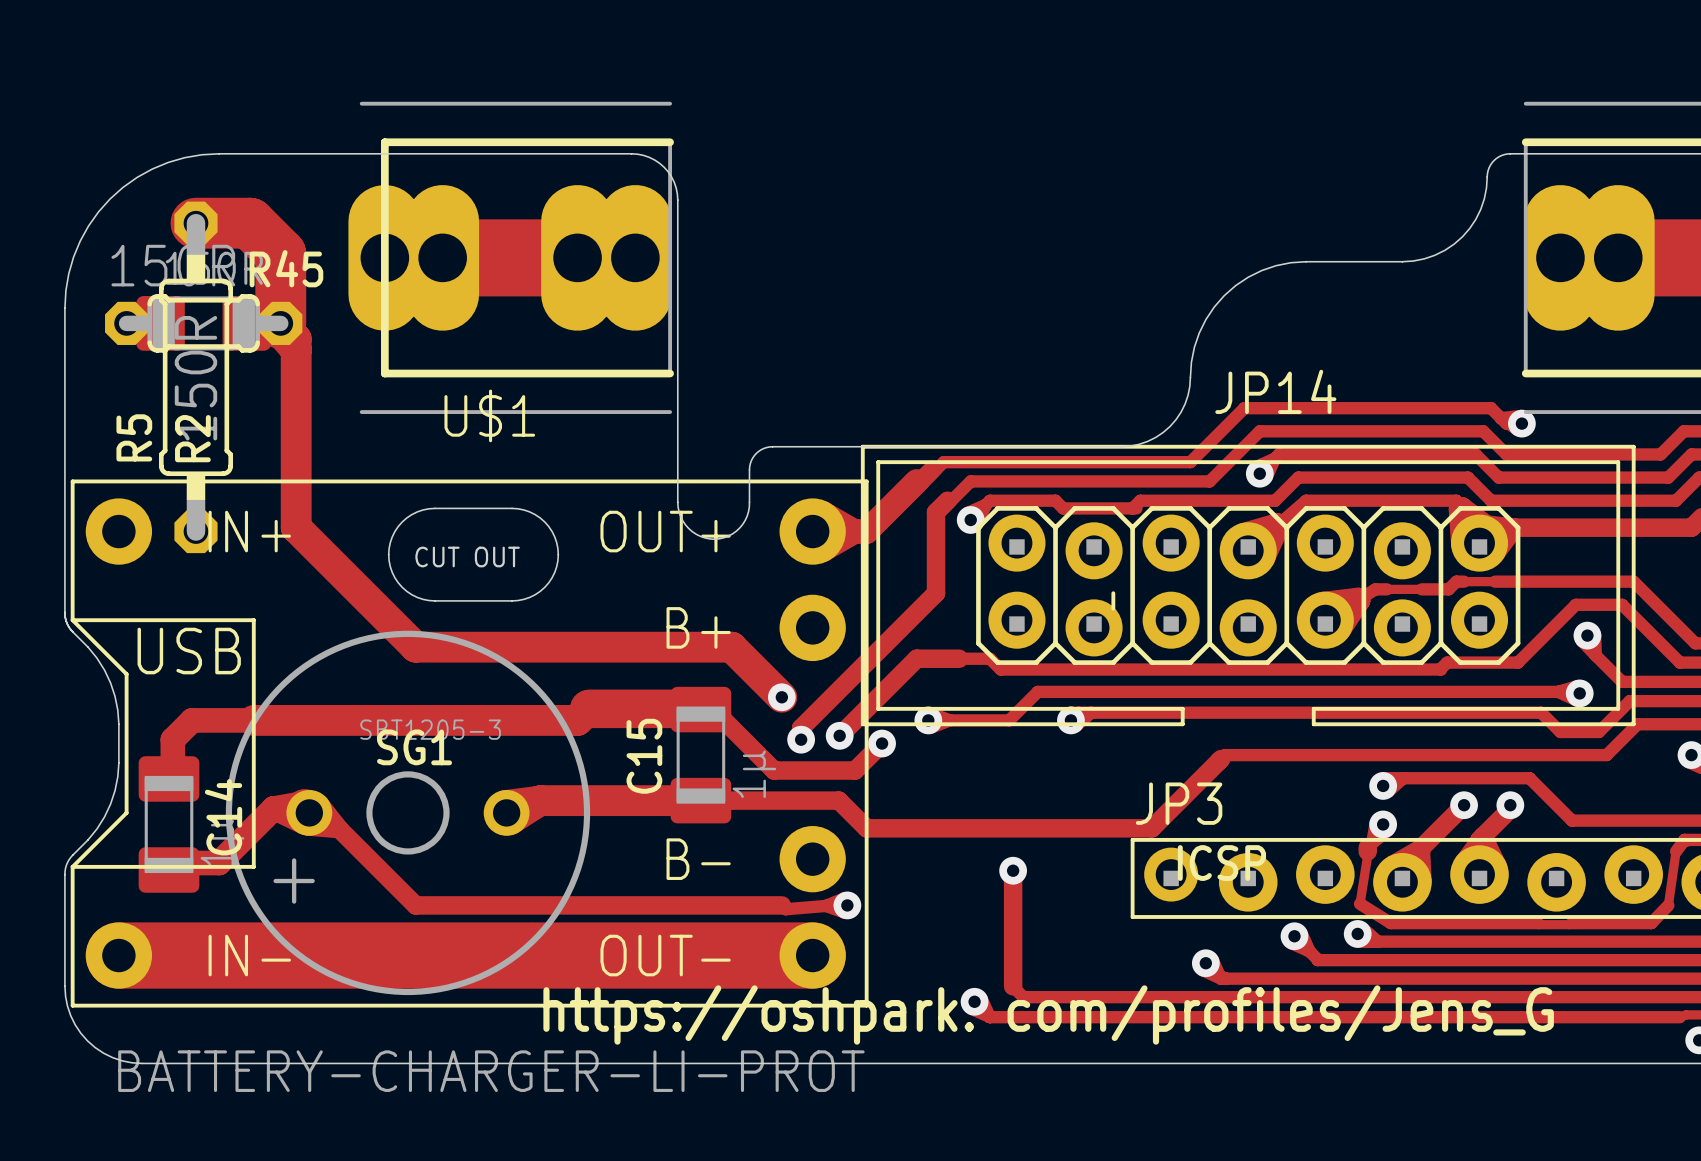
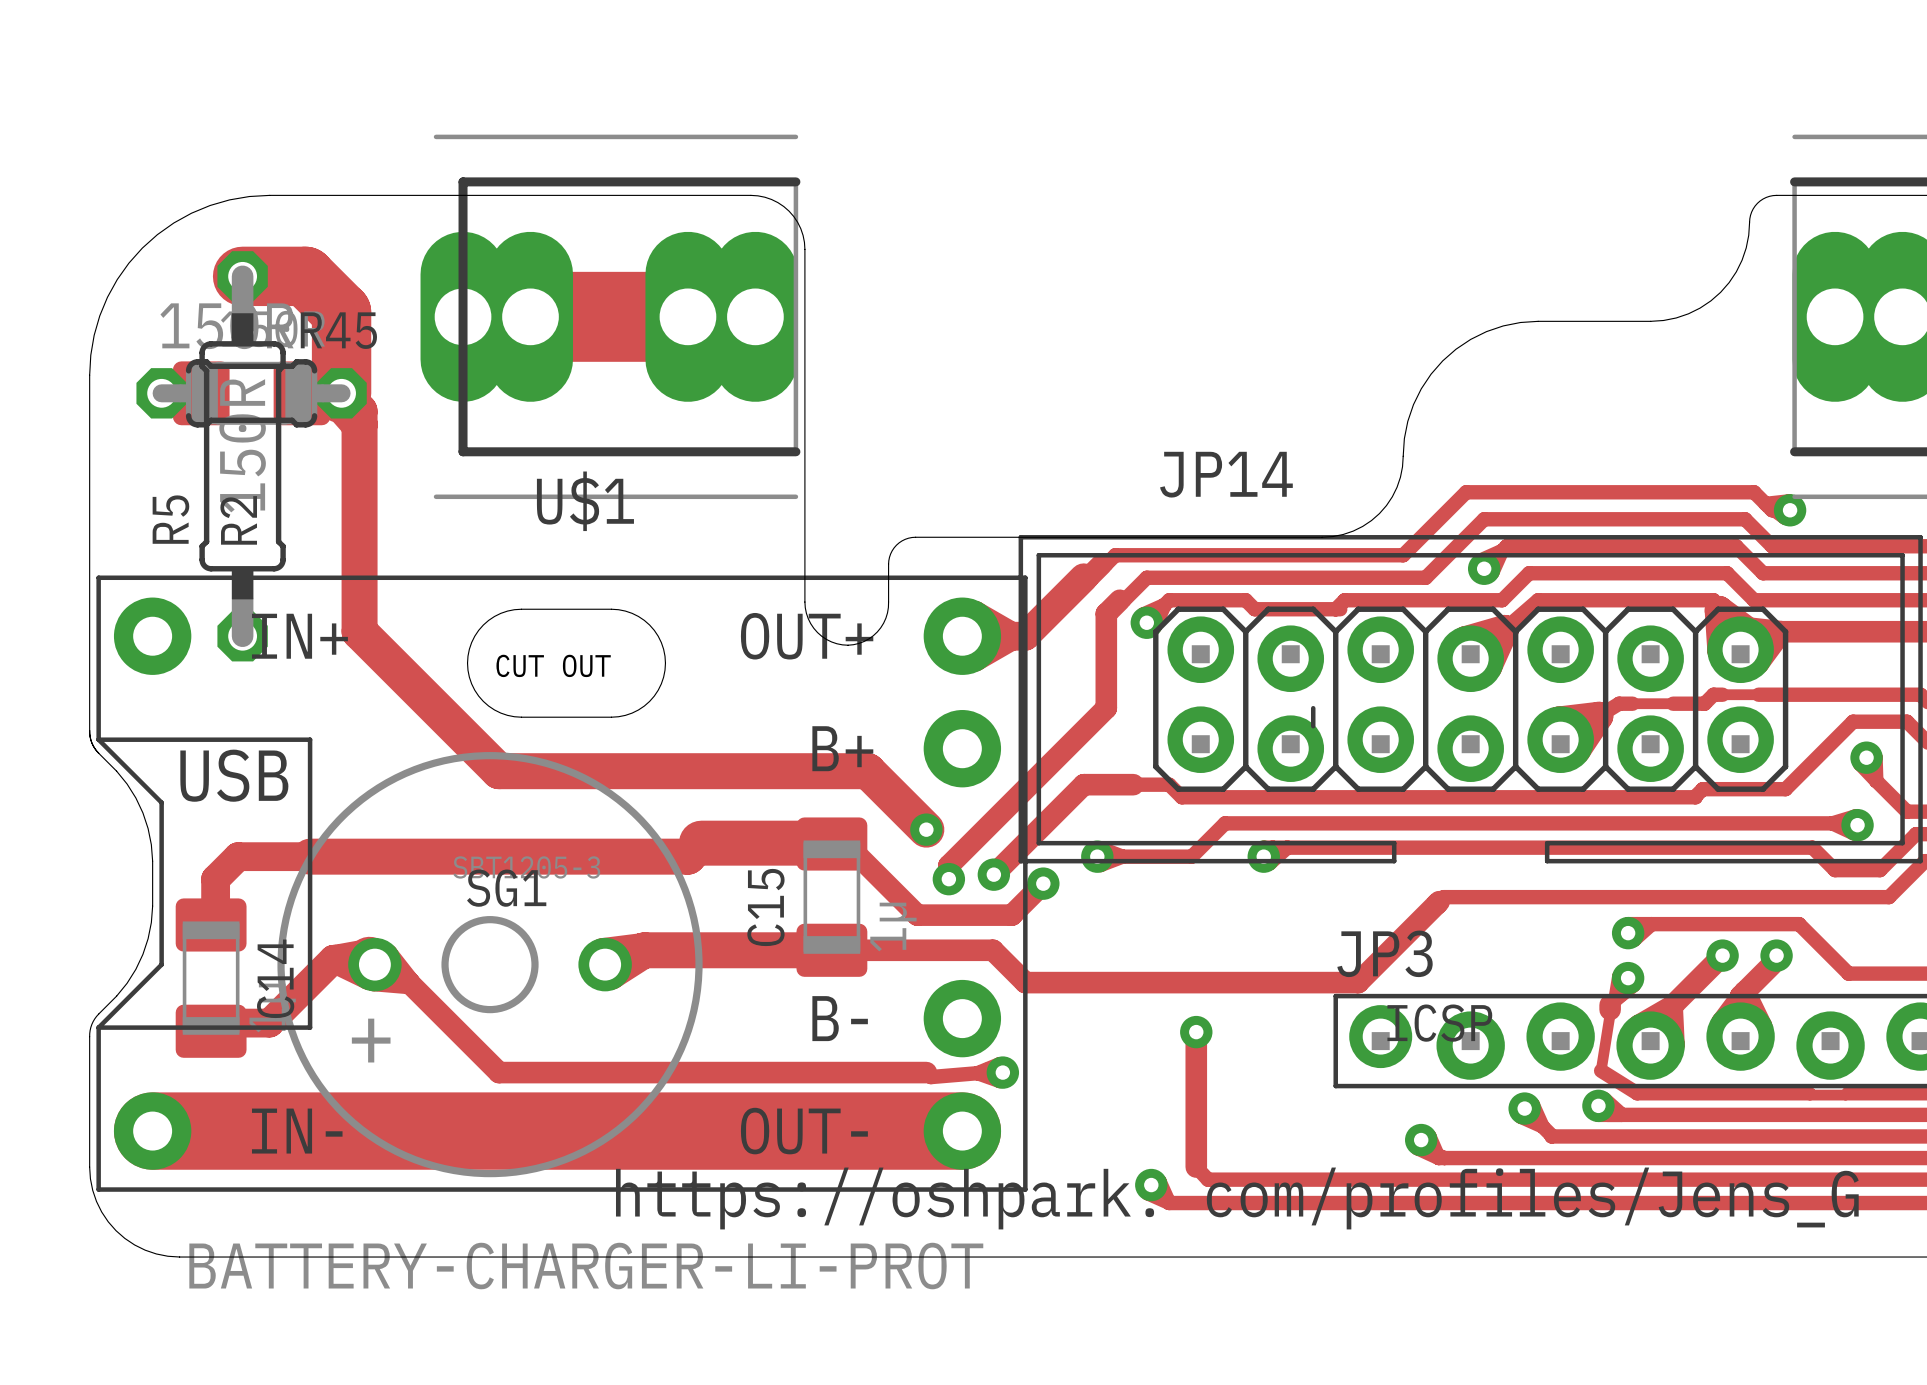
JP14 name position: JP14 (1275, 391) -> JP14 (1226, 474)

